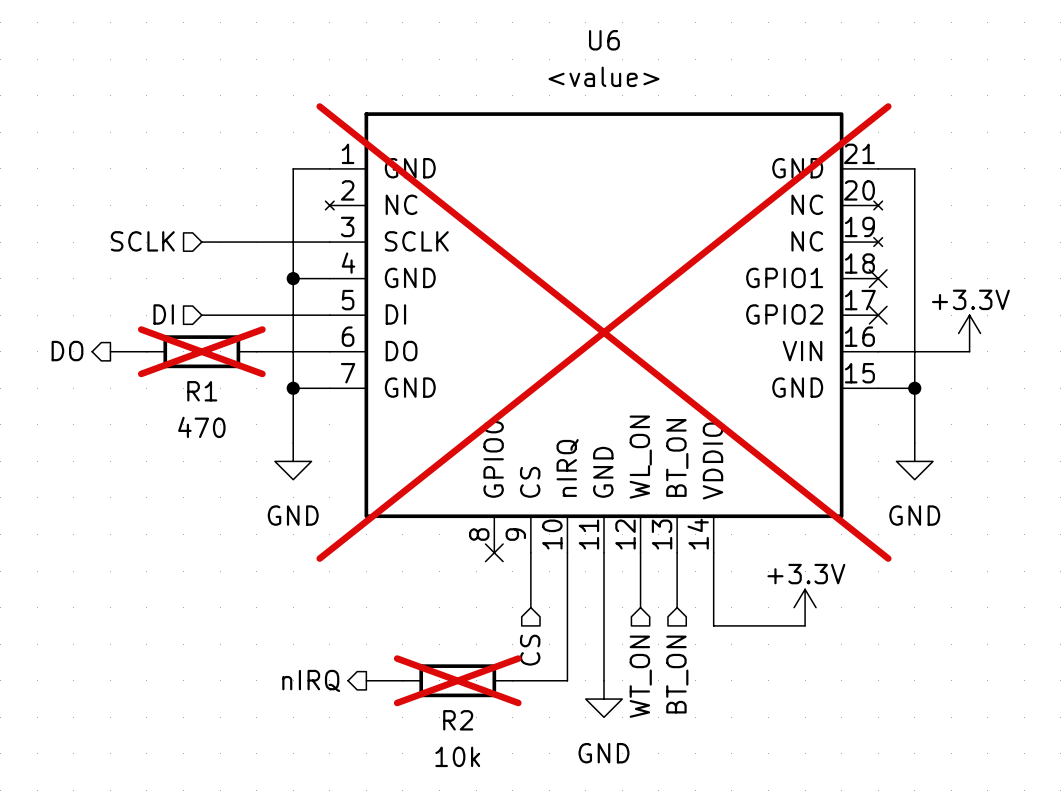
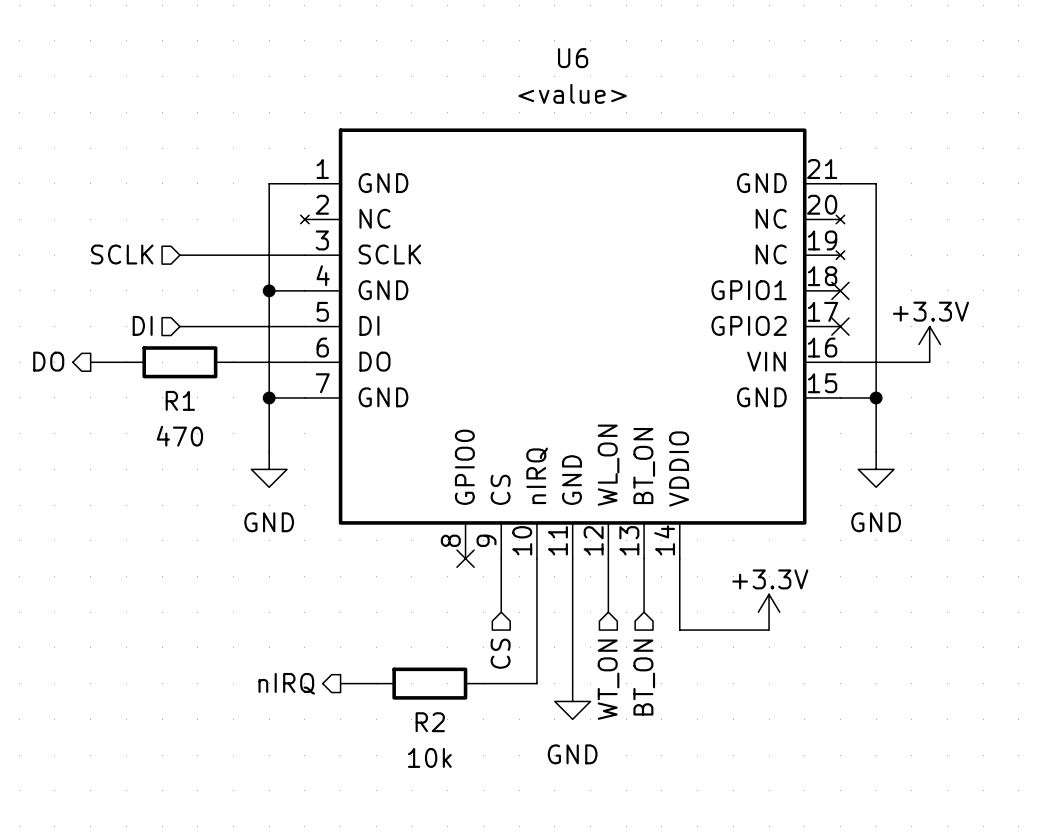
U6 do-not-place cross: (603, 332) -> none
R1 do-not-place cross: (201, 351) -> none
R2 do-not-place cross: (457, 680) -> none

